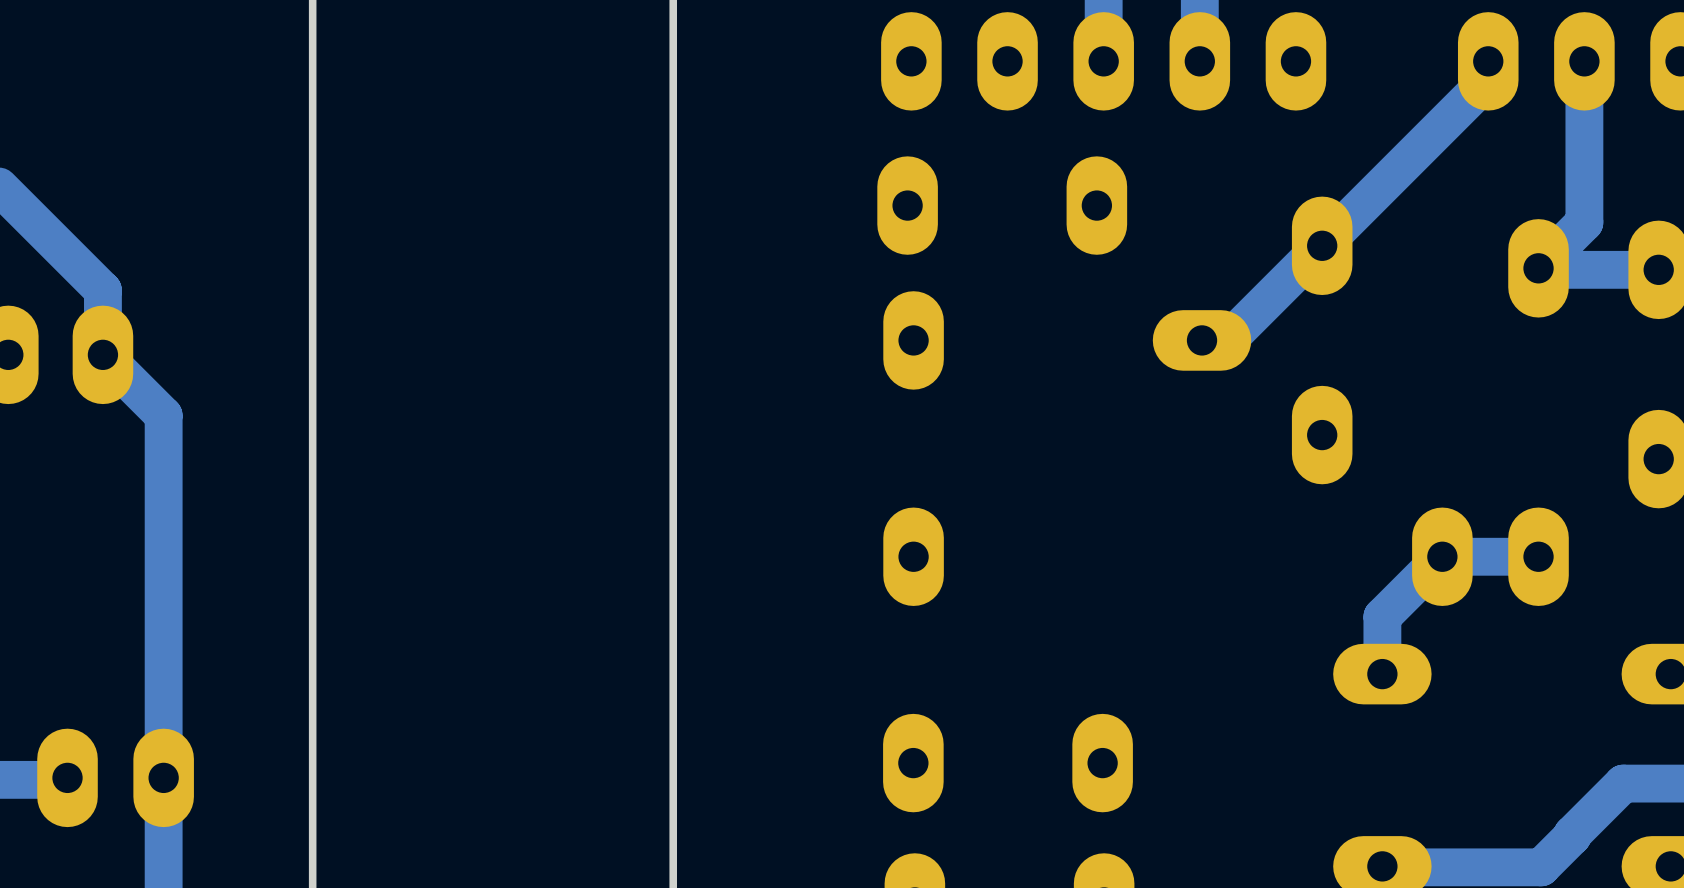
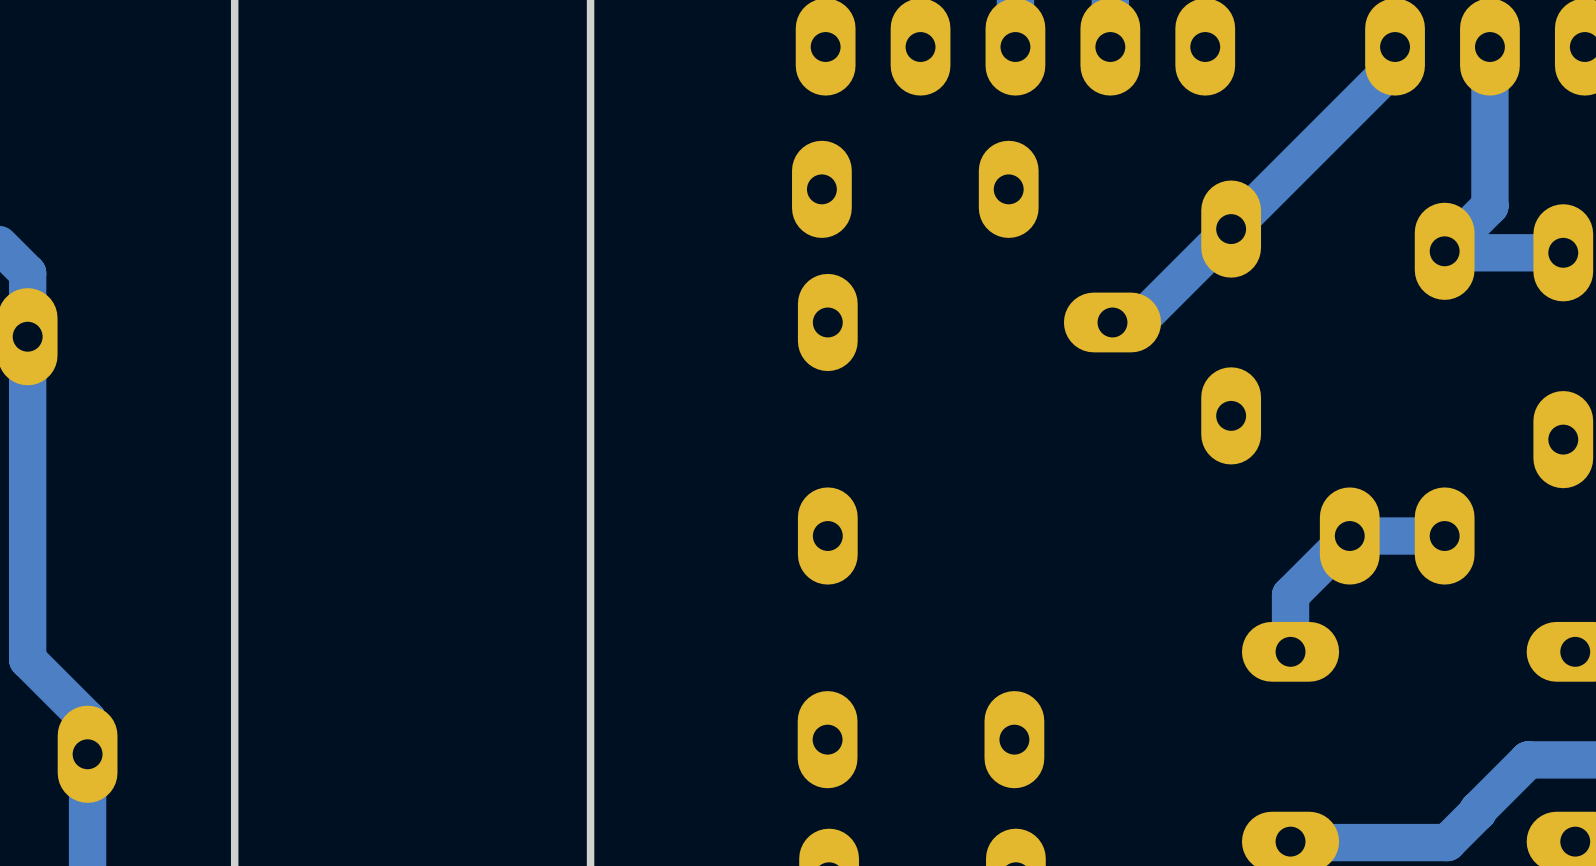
bottom track: (102, 354) (163, 415) (163, 742) -> (27, 336) (27, 659) (87, 719)

